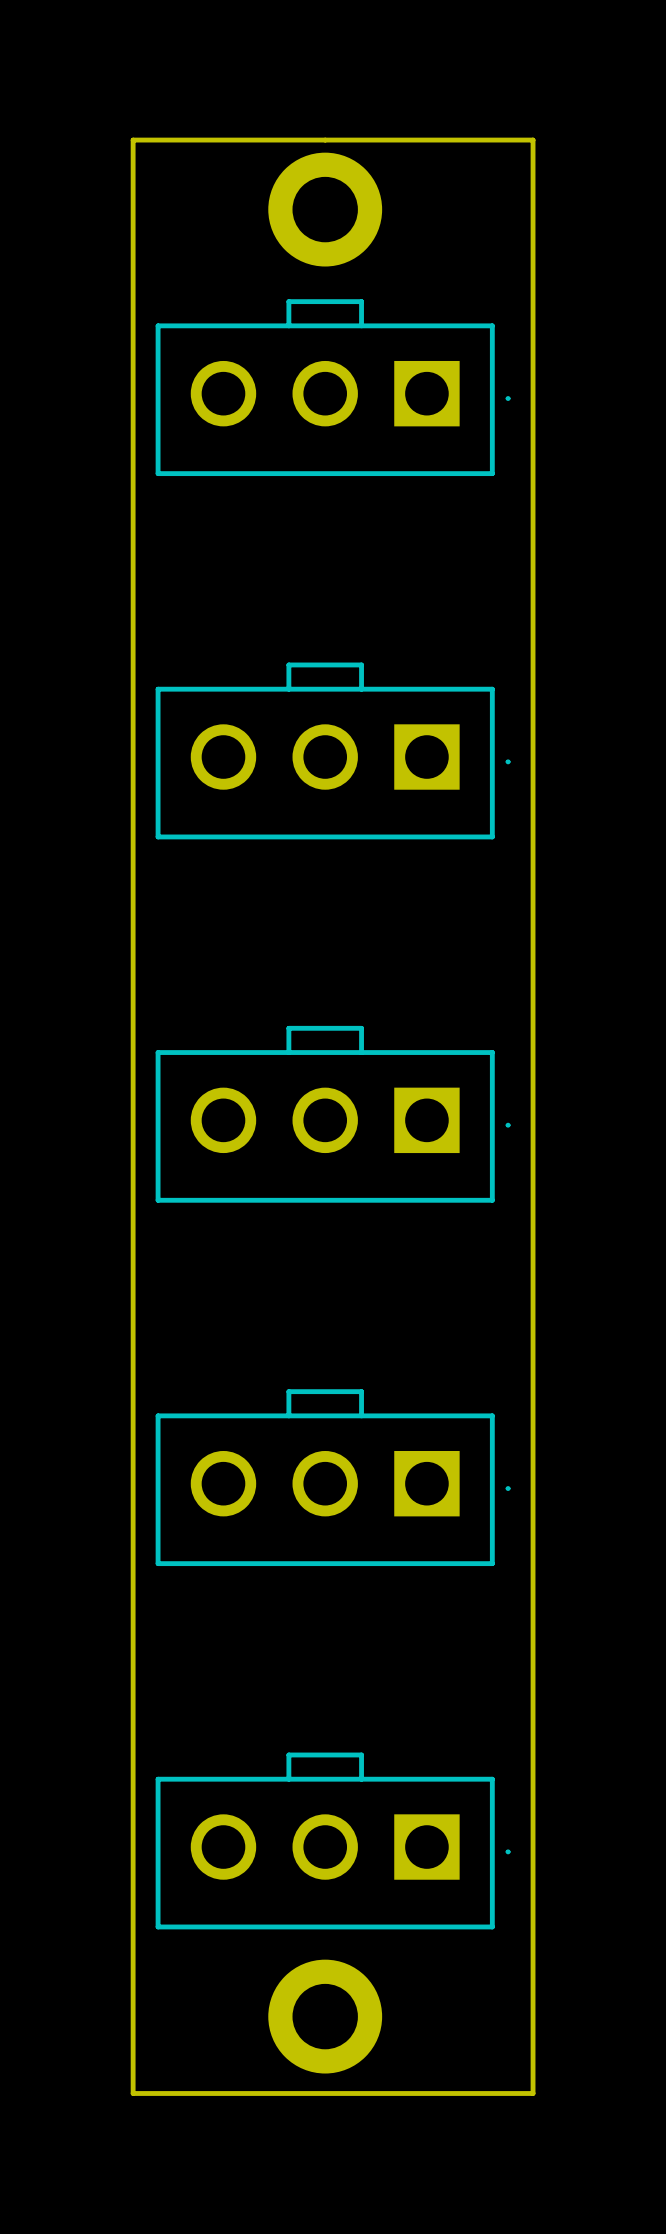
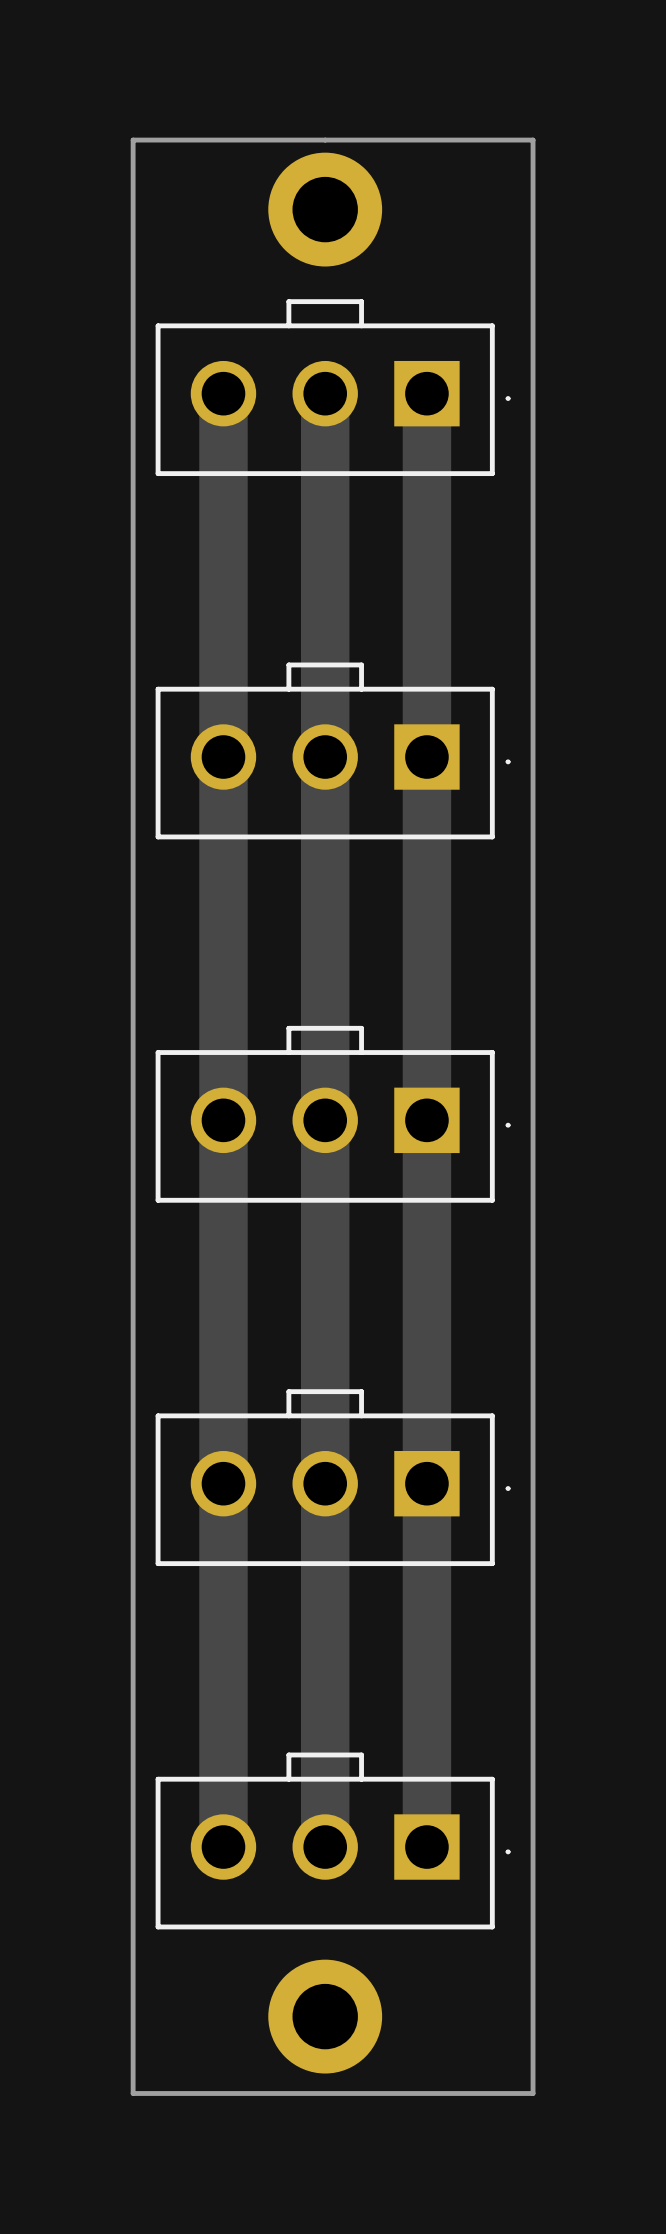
track: none -> (223, 393) (223, 1847)
track: none -> (325, 393) (325, 1847)
track: none -> (426, 393) (426, 1847)

